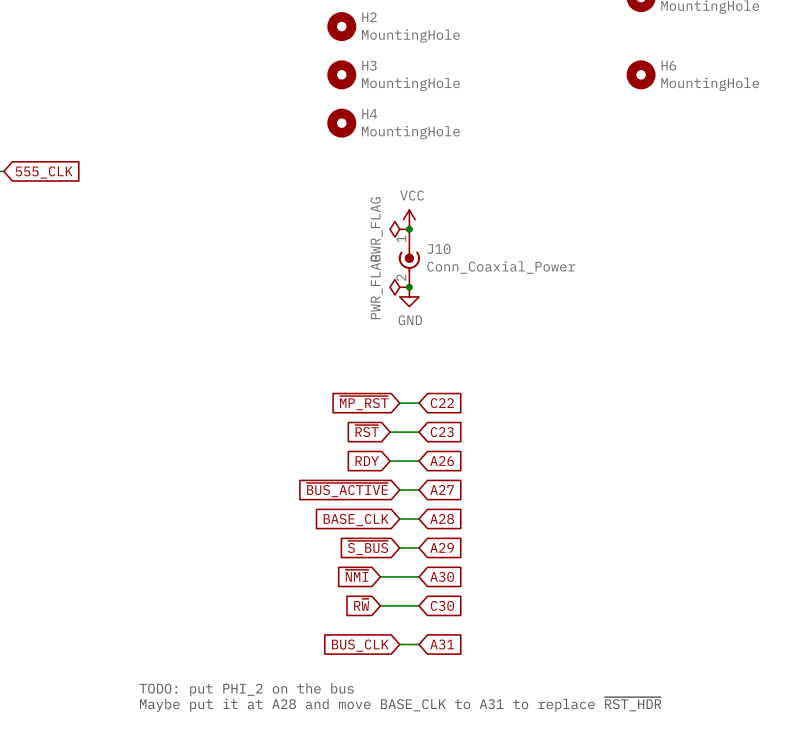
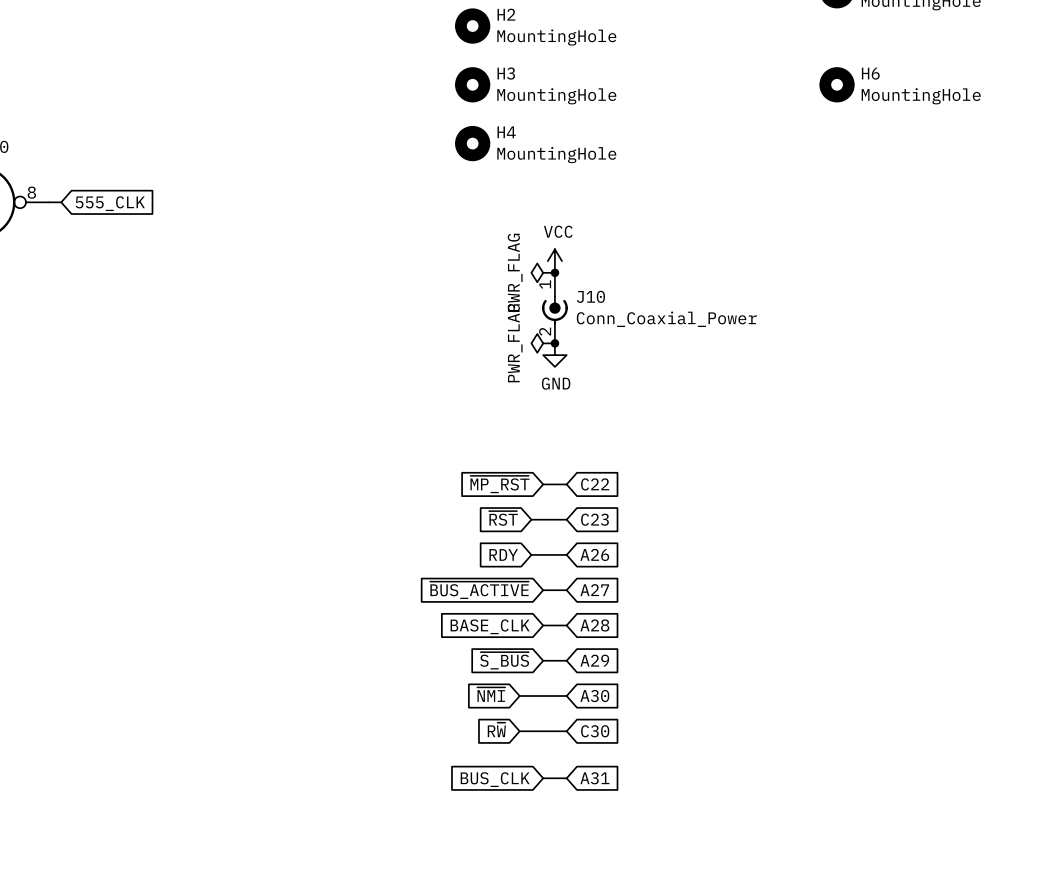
text: TODO: put PHI_2 on the bus (246, 689) -> none
text: Maybe put it at A28 and move BASE_CLK to A31 to replace ~{RST_HDR} (400, 704) -> none

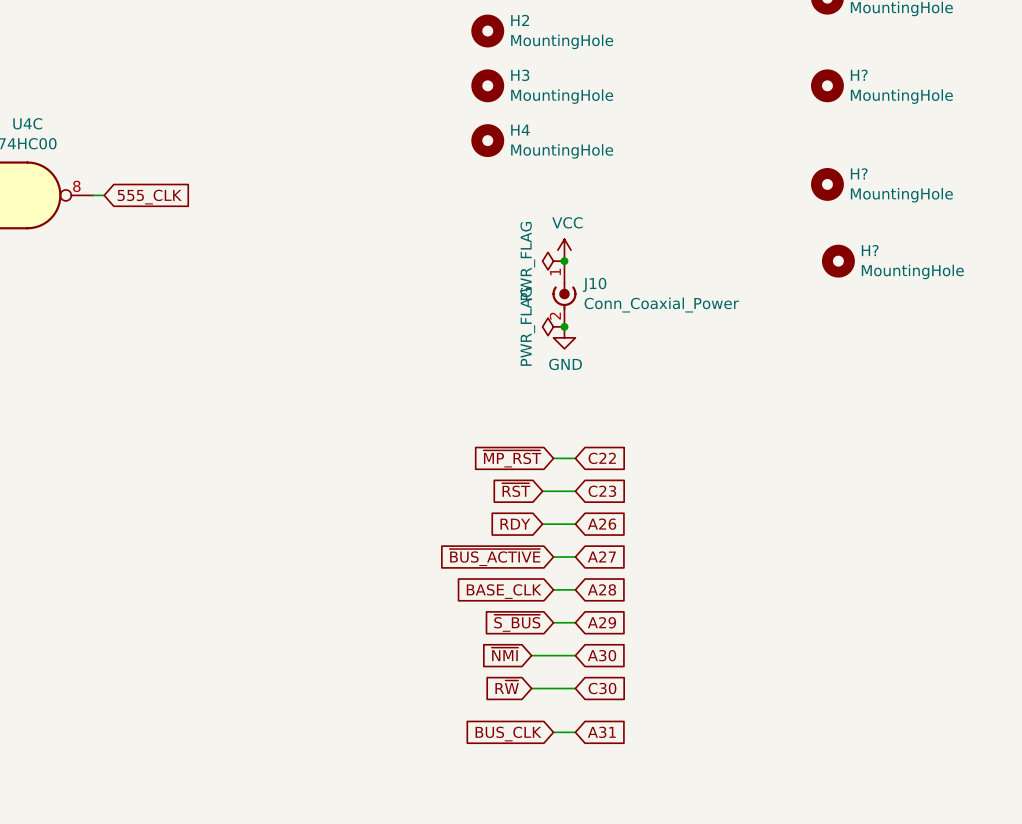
H6 name: H6 (870, 73) -> H? (859, 75)
H?: none -> MountingHole (827, 184)
H?: none -> MountingHole (838, 261)

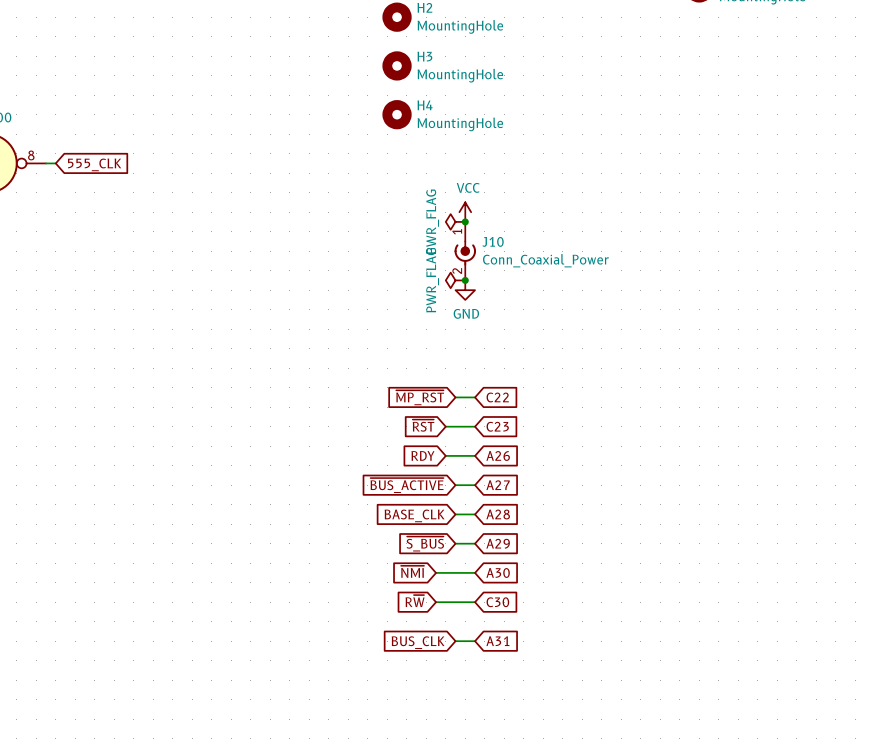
H?: MountingHole (827, 85) -> none
H?: MountingHole (827, 184) -> none
H?: MountingHole (838, 261) -> none

